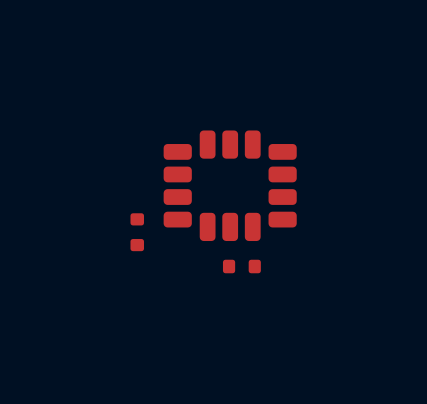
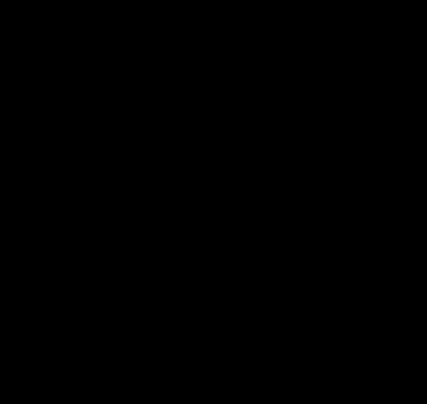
part: (230, 185) -> none
part: (137, 232) -> none
part: (241, 266) -> none

